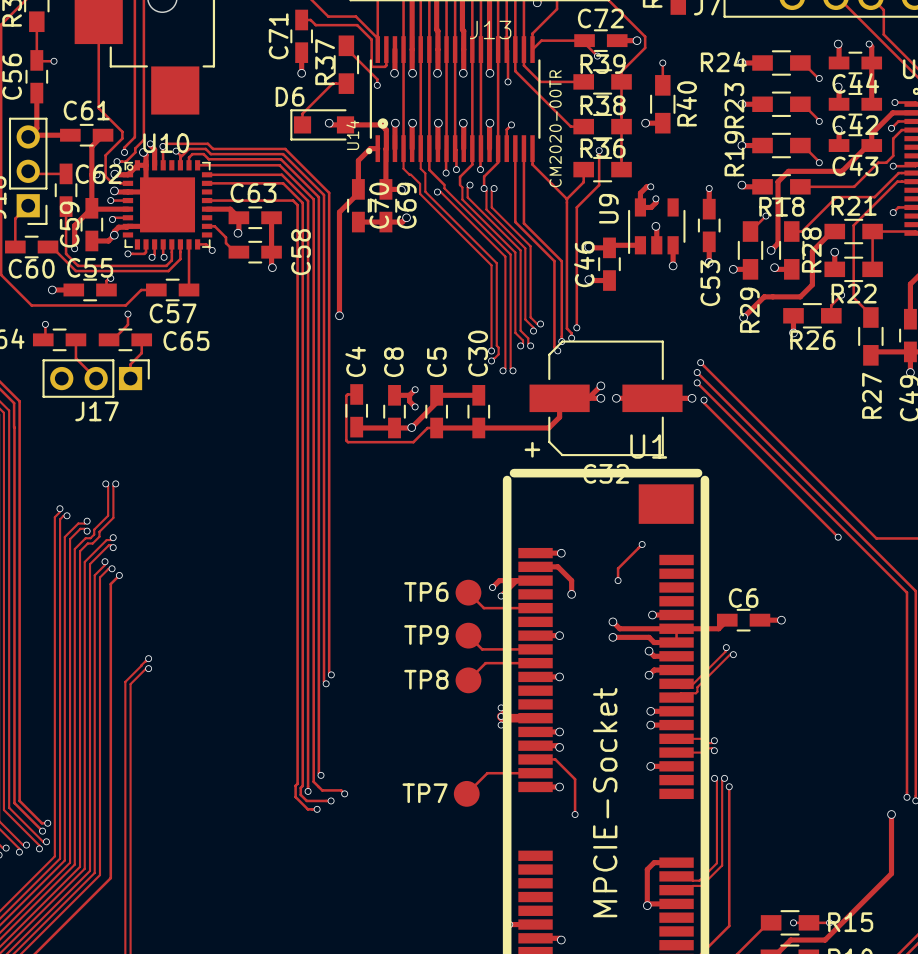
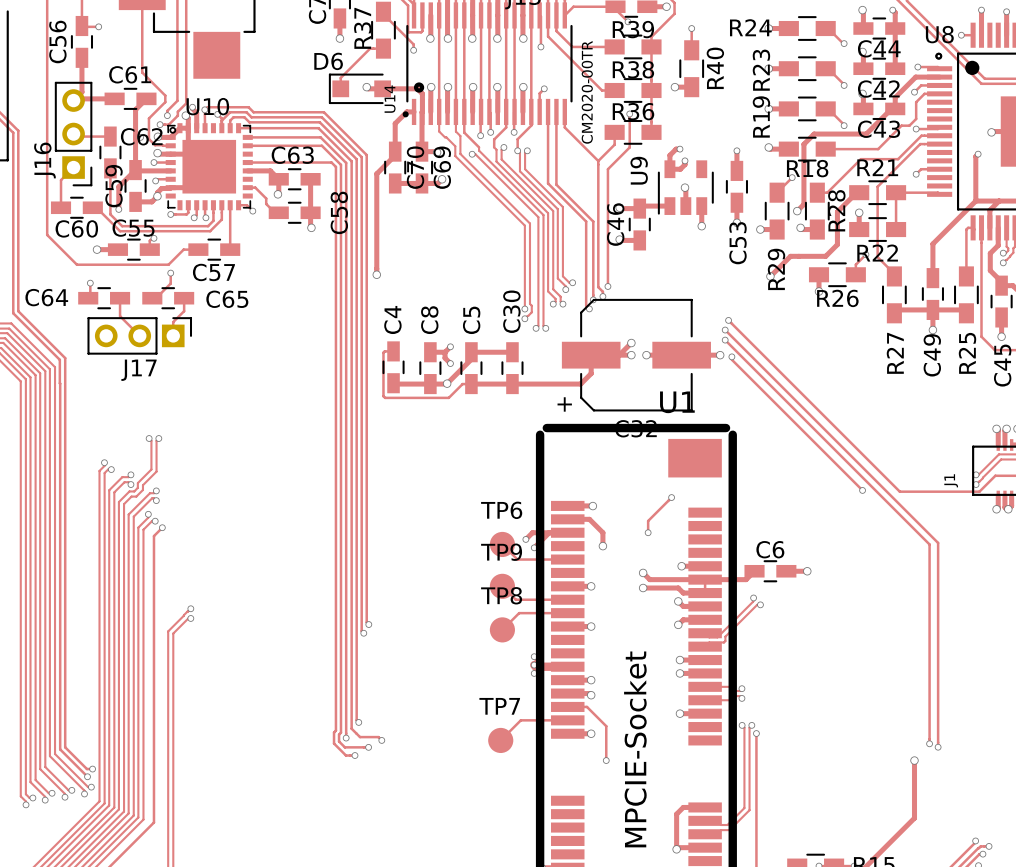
TP6 name position: TP6 (426, 592) -> TP6 (501, 510)
TP9 name position: TP9 (426, 635) -> TP9 (501, 552)
TP8 name position: TP8 (426, 679) -> TP8 (501, 595)
TP7 name position: TP7 (425, 793) -> TP7 (499, 706)

